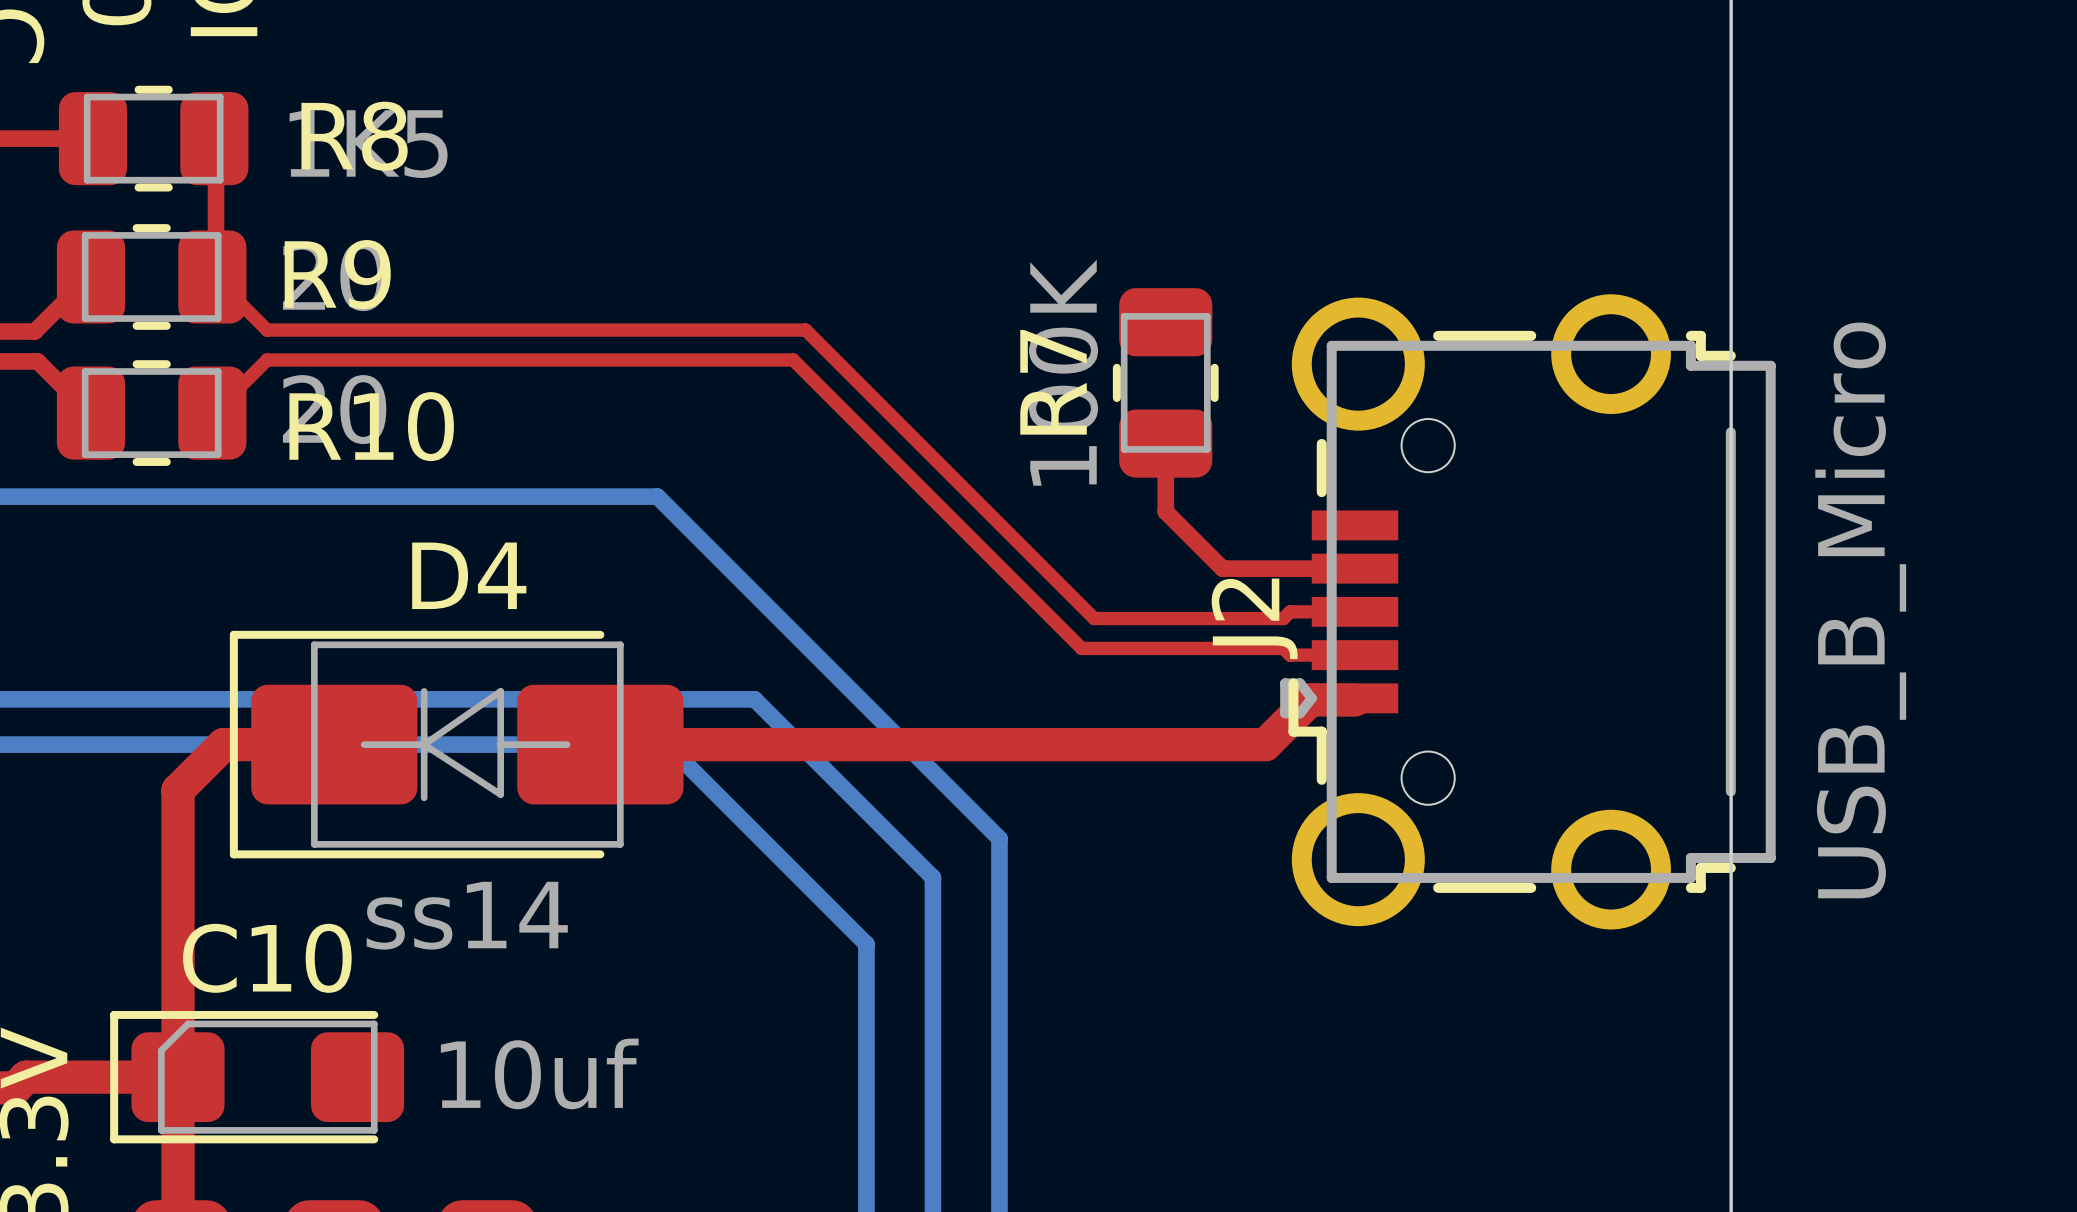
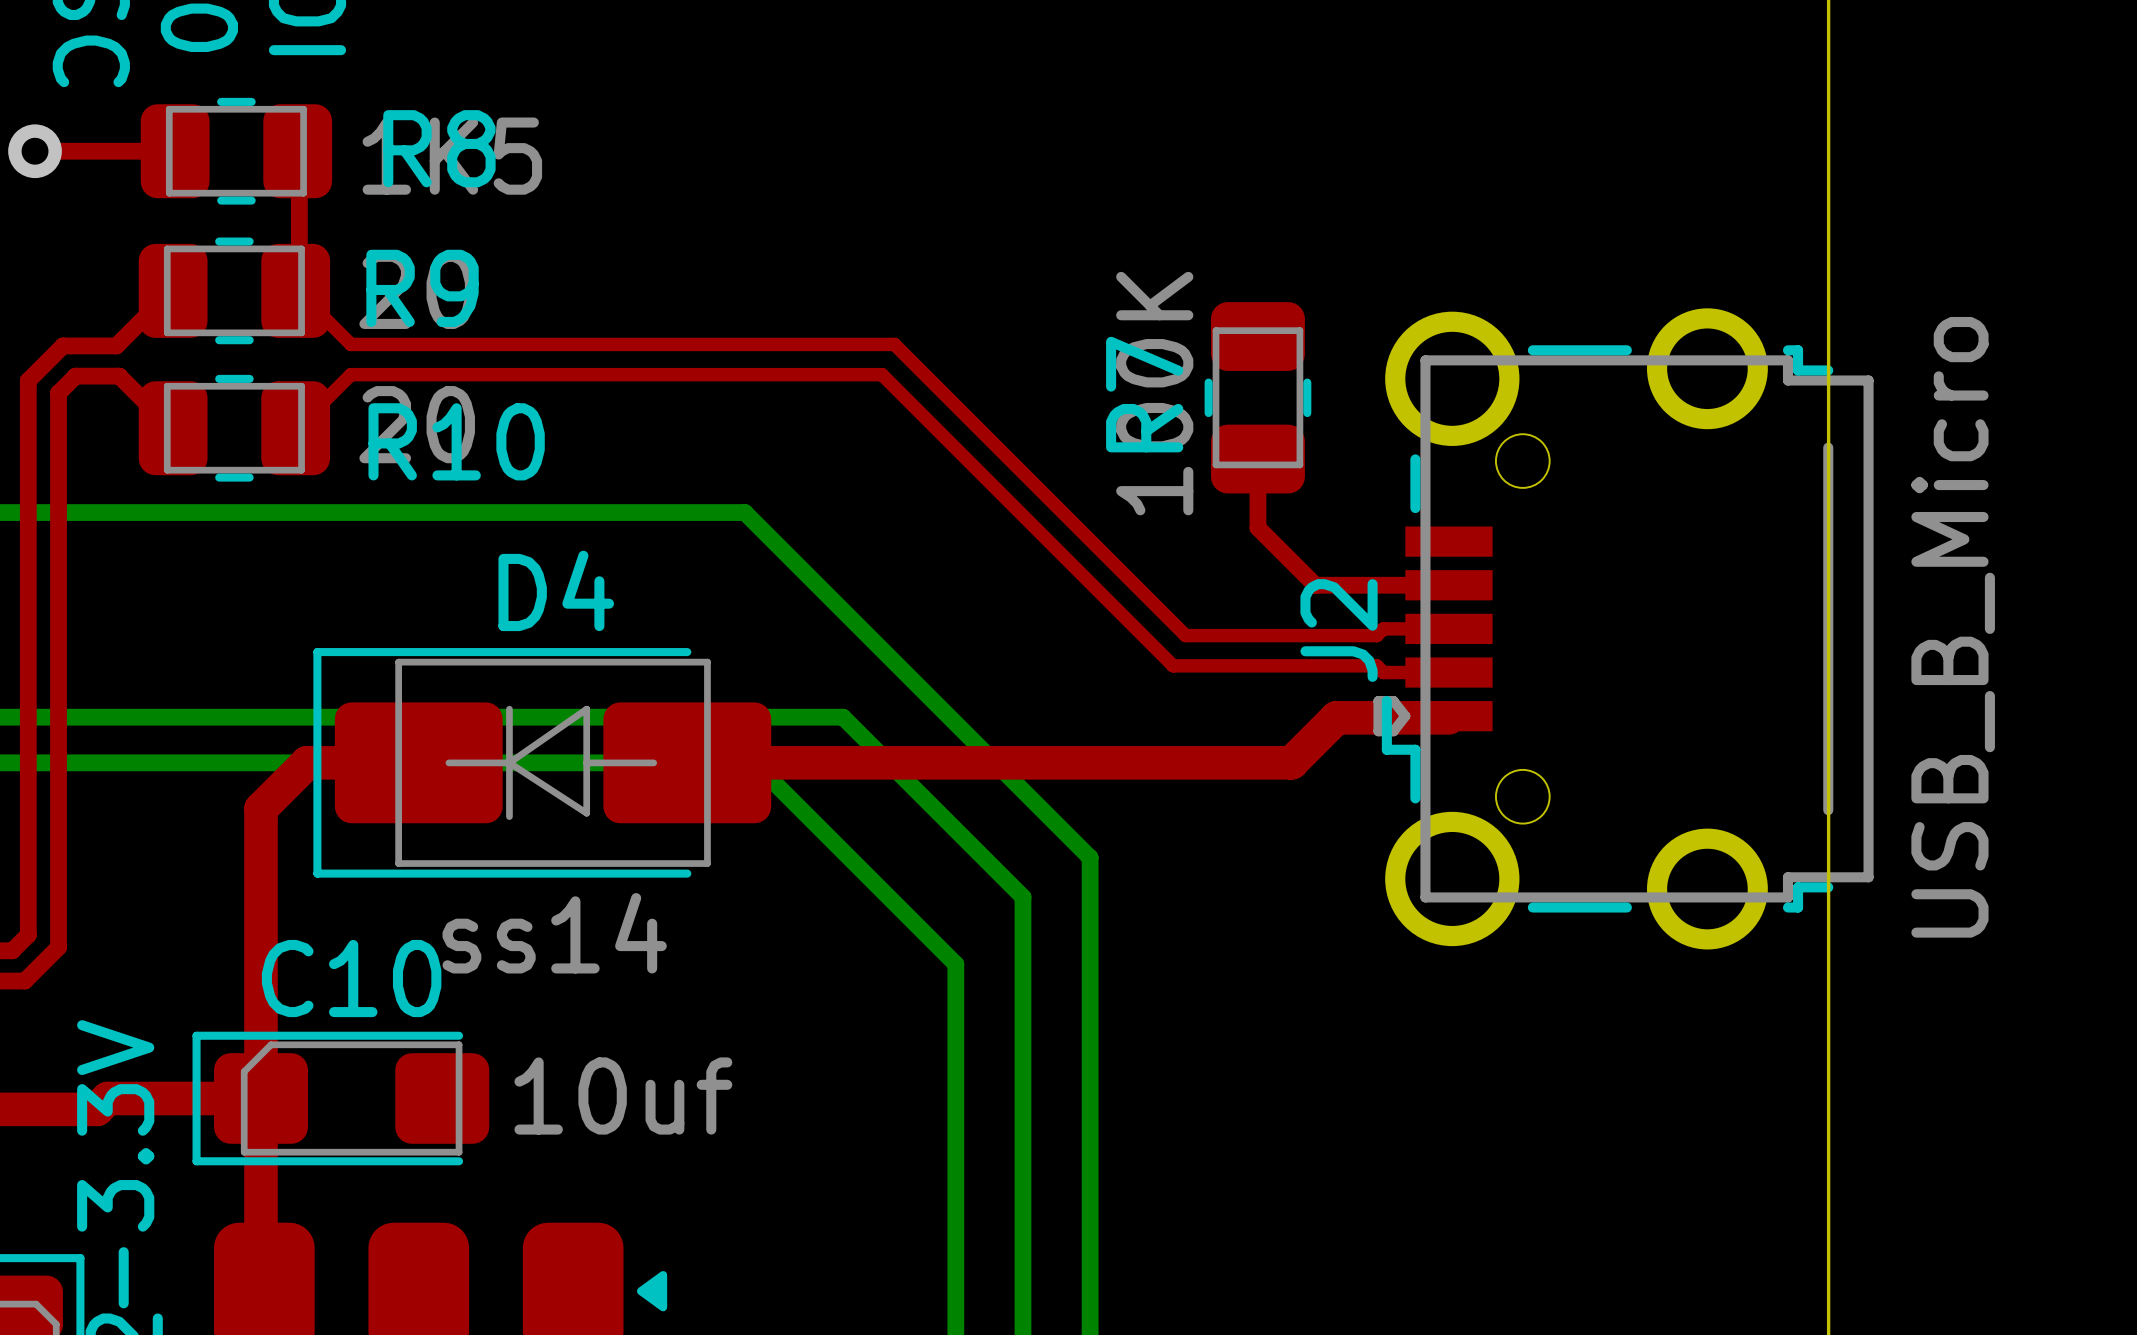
top track: (1310, 700) (1265, 744) (1199, 744) -> (1403, 717) (1336, 717) (1291, 762)

